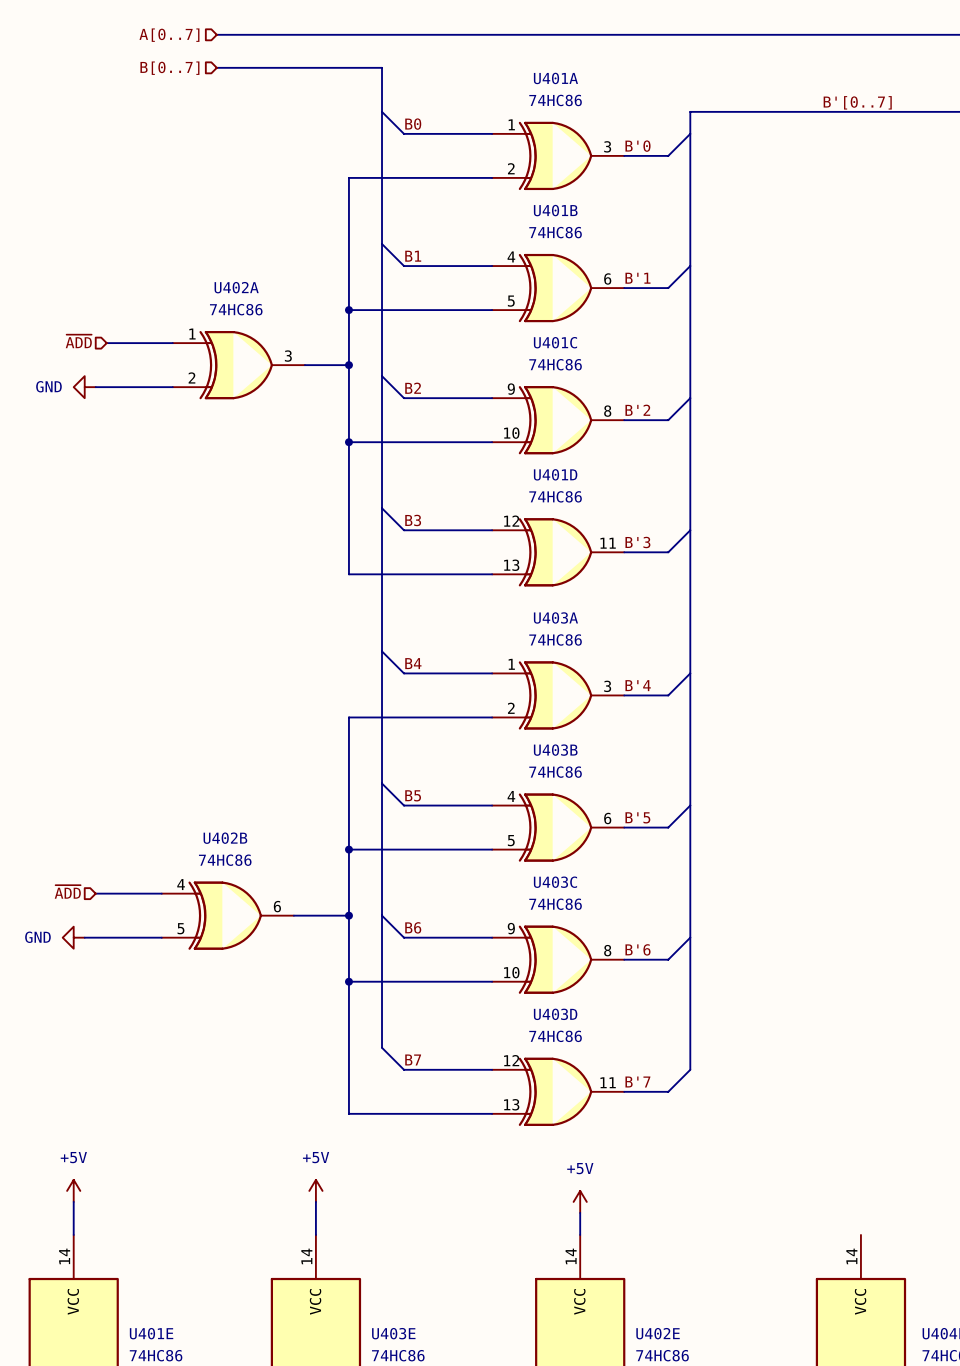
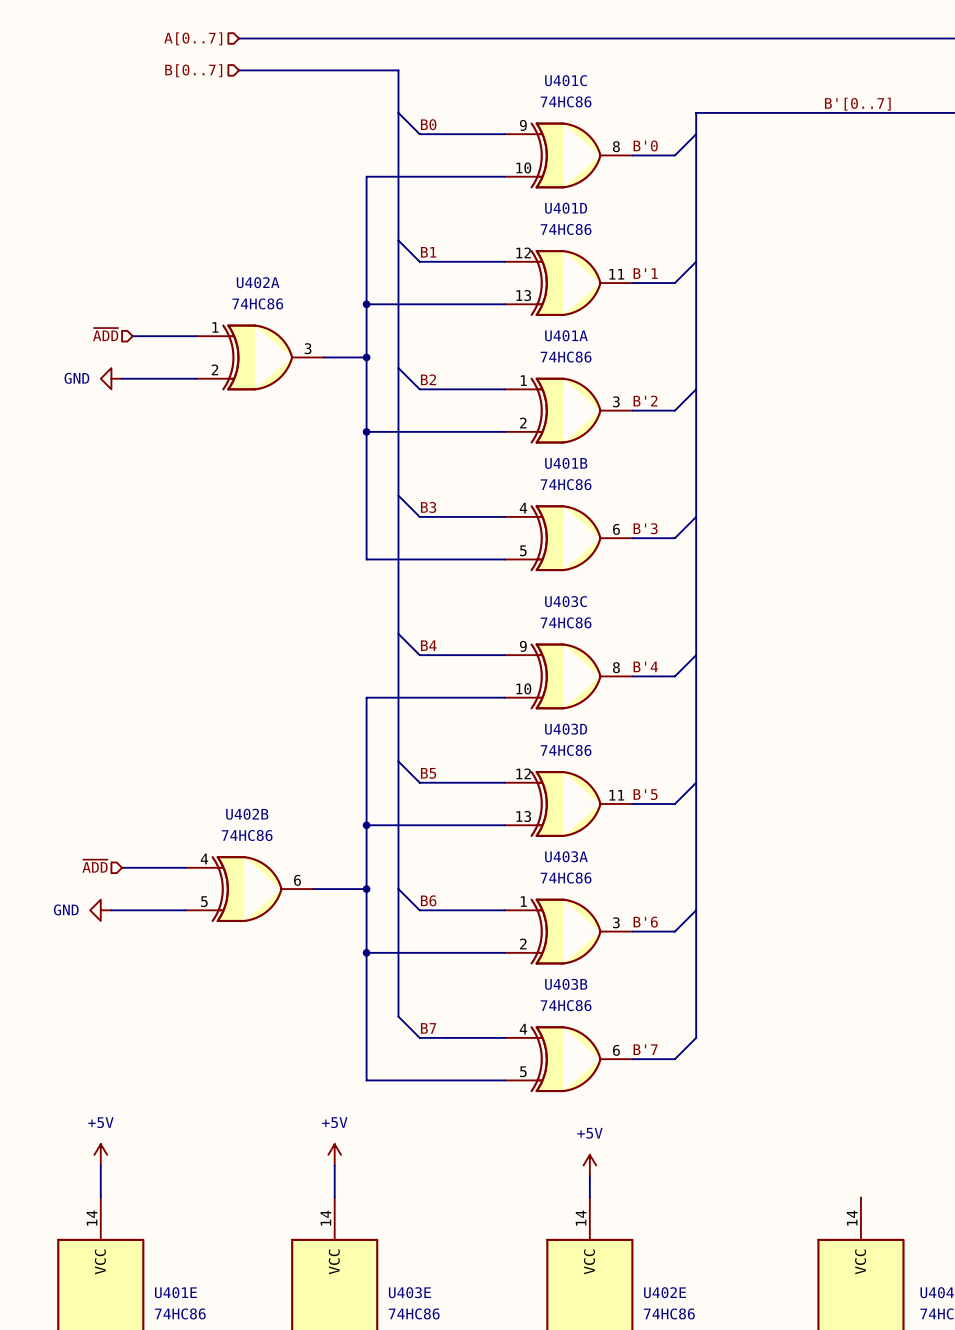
U401A position: (558, 155) -> (568, 410)
U401B position: (558, 288) -> (568, 538)
U401C position: (558, 420) -> (568, 155)
U401D position: (558, 552) -> (568, 283)
U403A position: (558, 695) -> (568, 931)
U403B position: (558, 827) -> (568, 1059)
U403C position: (558, 959) -> (568, 676)
U403D position: (558, 1091) -> (568, 804)

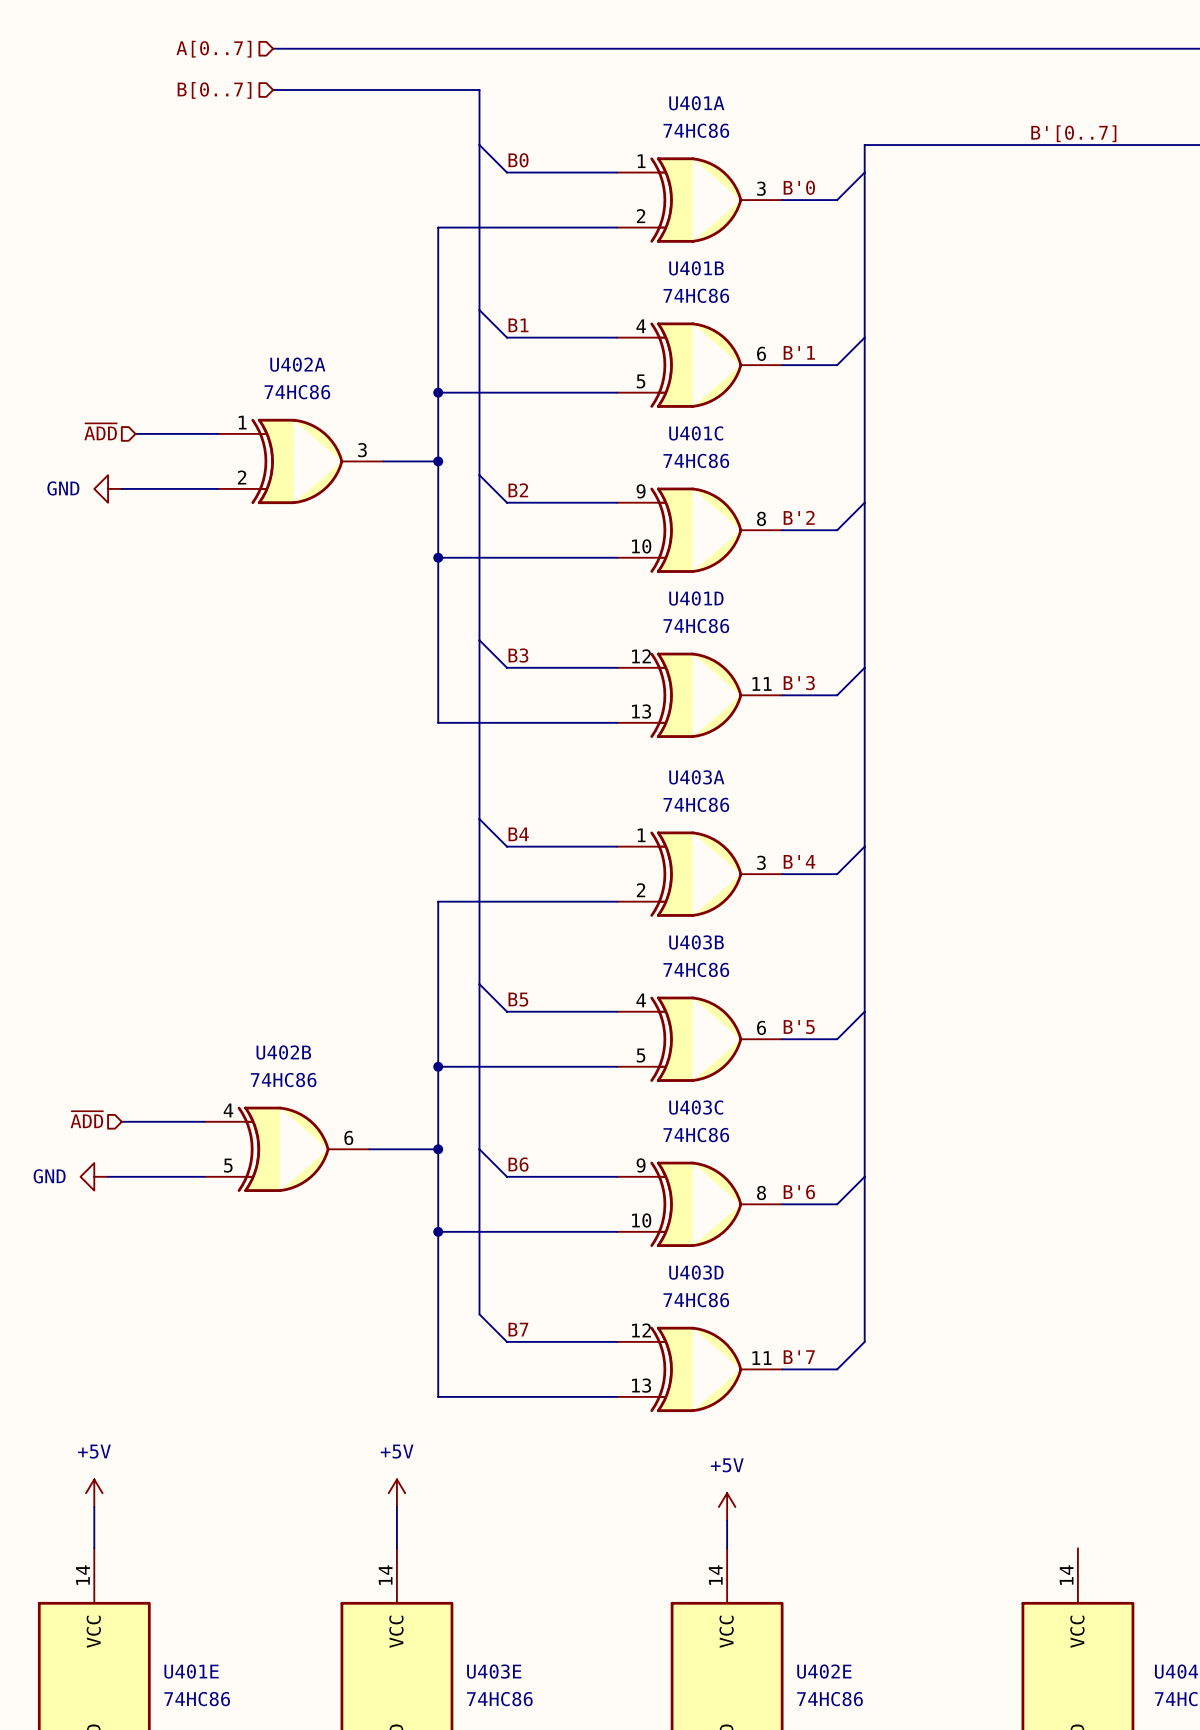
U401C position: (568, 155) -> (699, 530)
U401D position: (568, 283) -> (699, 695)
U401A position: (568, 410) -> (699, 200)
U401B position: (568, 538) -> (699, 365)
U403C position: (568, 676) -> (699, 1204)
U403D position: (568, 804) -> (699, 1369)
U403A position: (568, 931) -> (699, 874)
U403B position: (568, 1059) -> (699, 1039)

